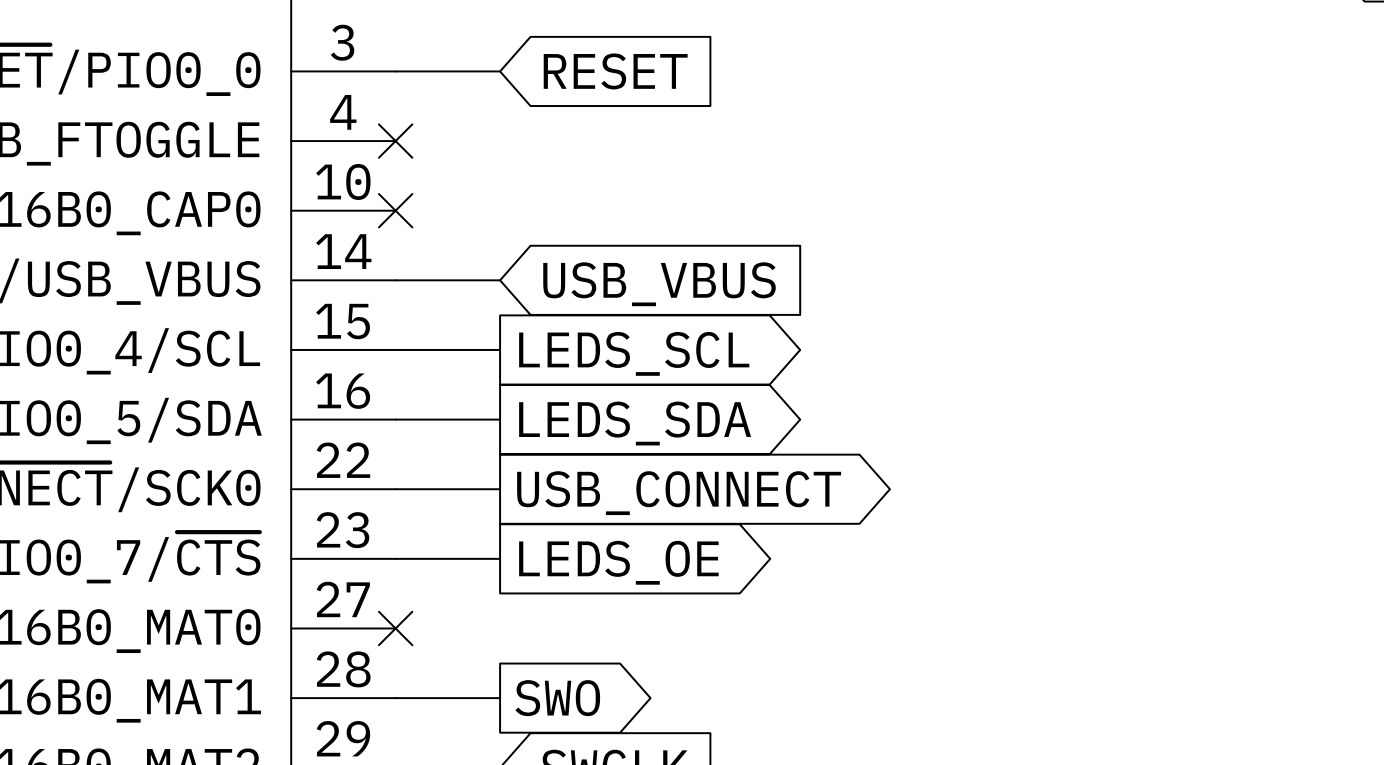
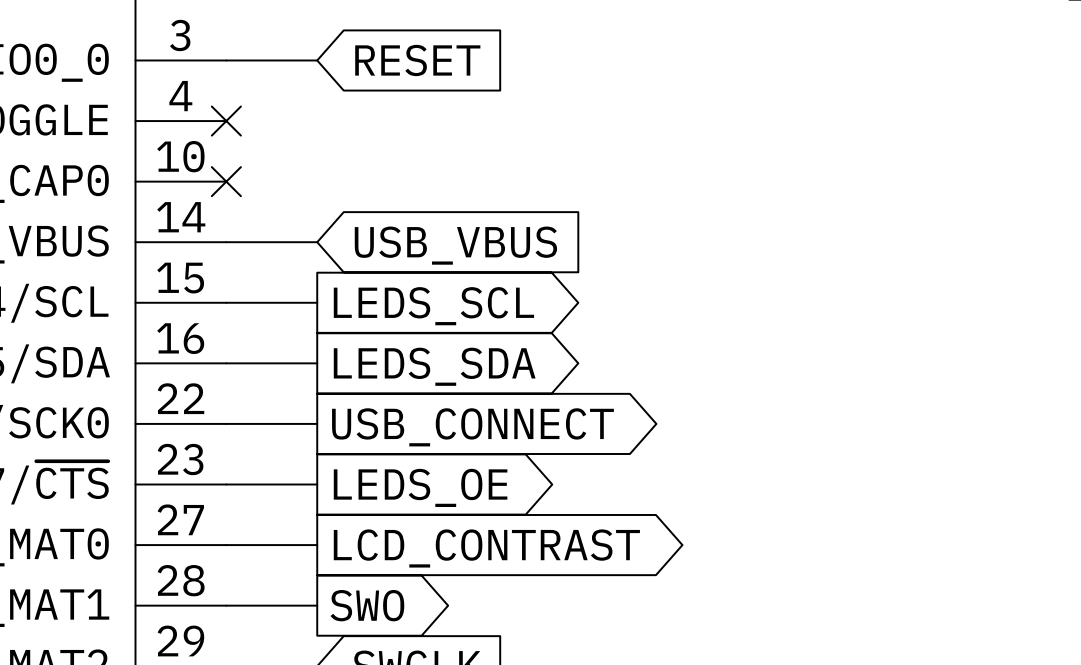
wire: none -> (226, 545) (317, 545)
no-connect mark: (395, 628) -> none
global label: none -> LCD_CONTRAST (486, 548)

